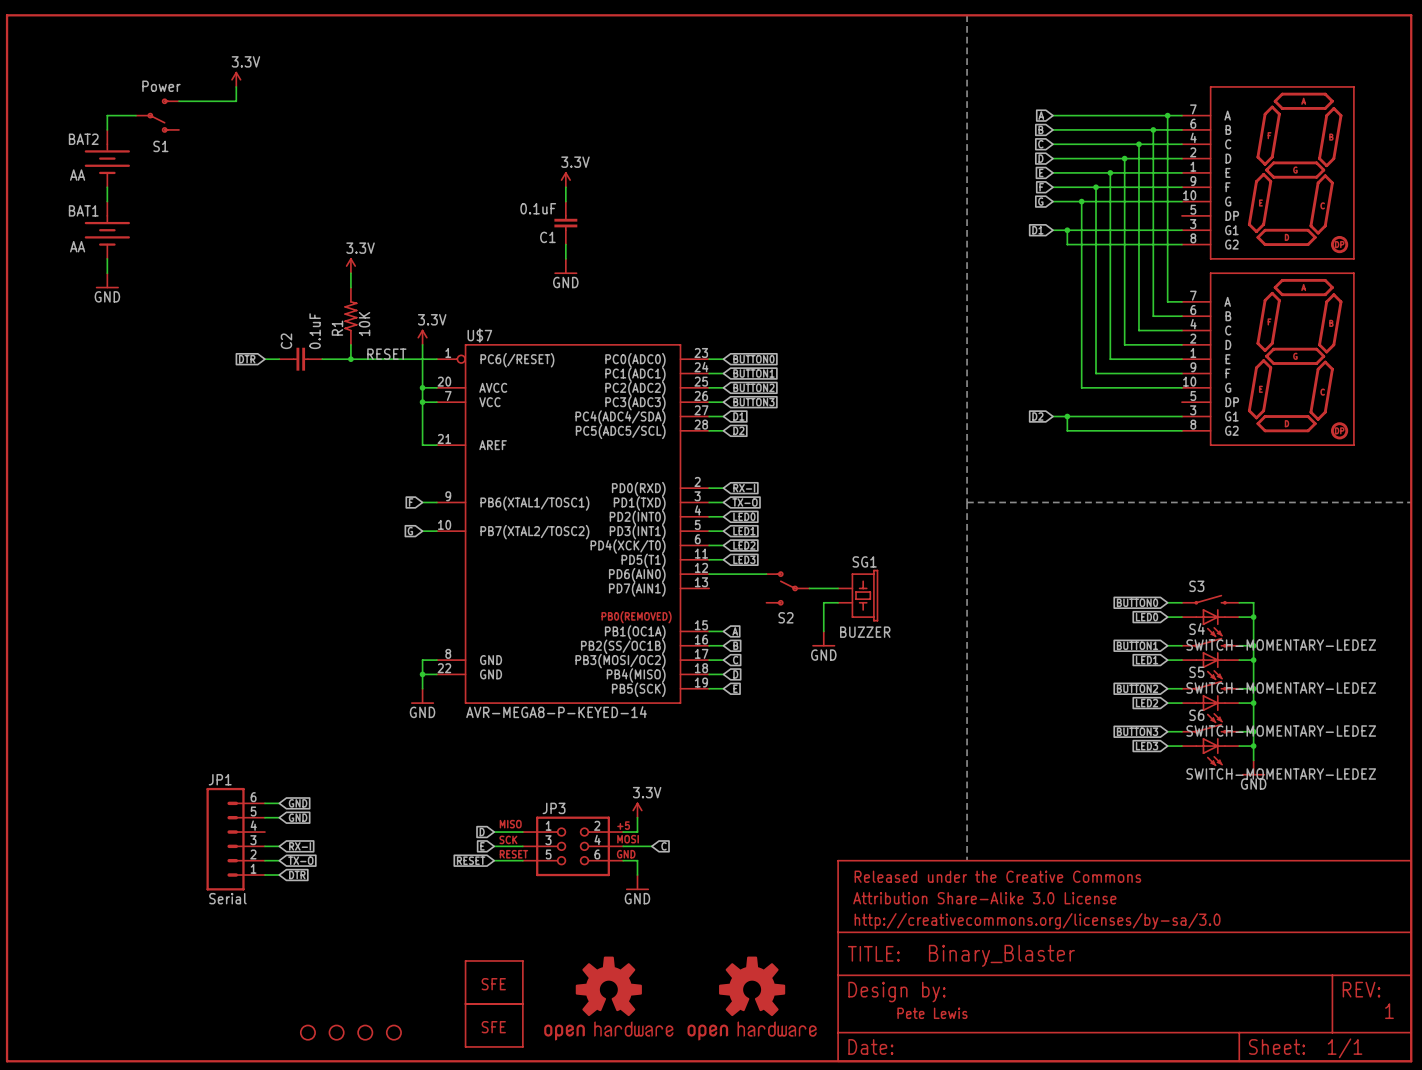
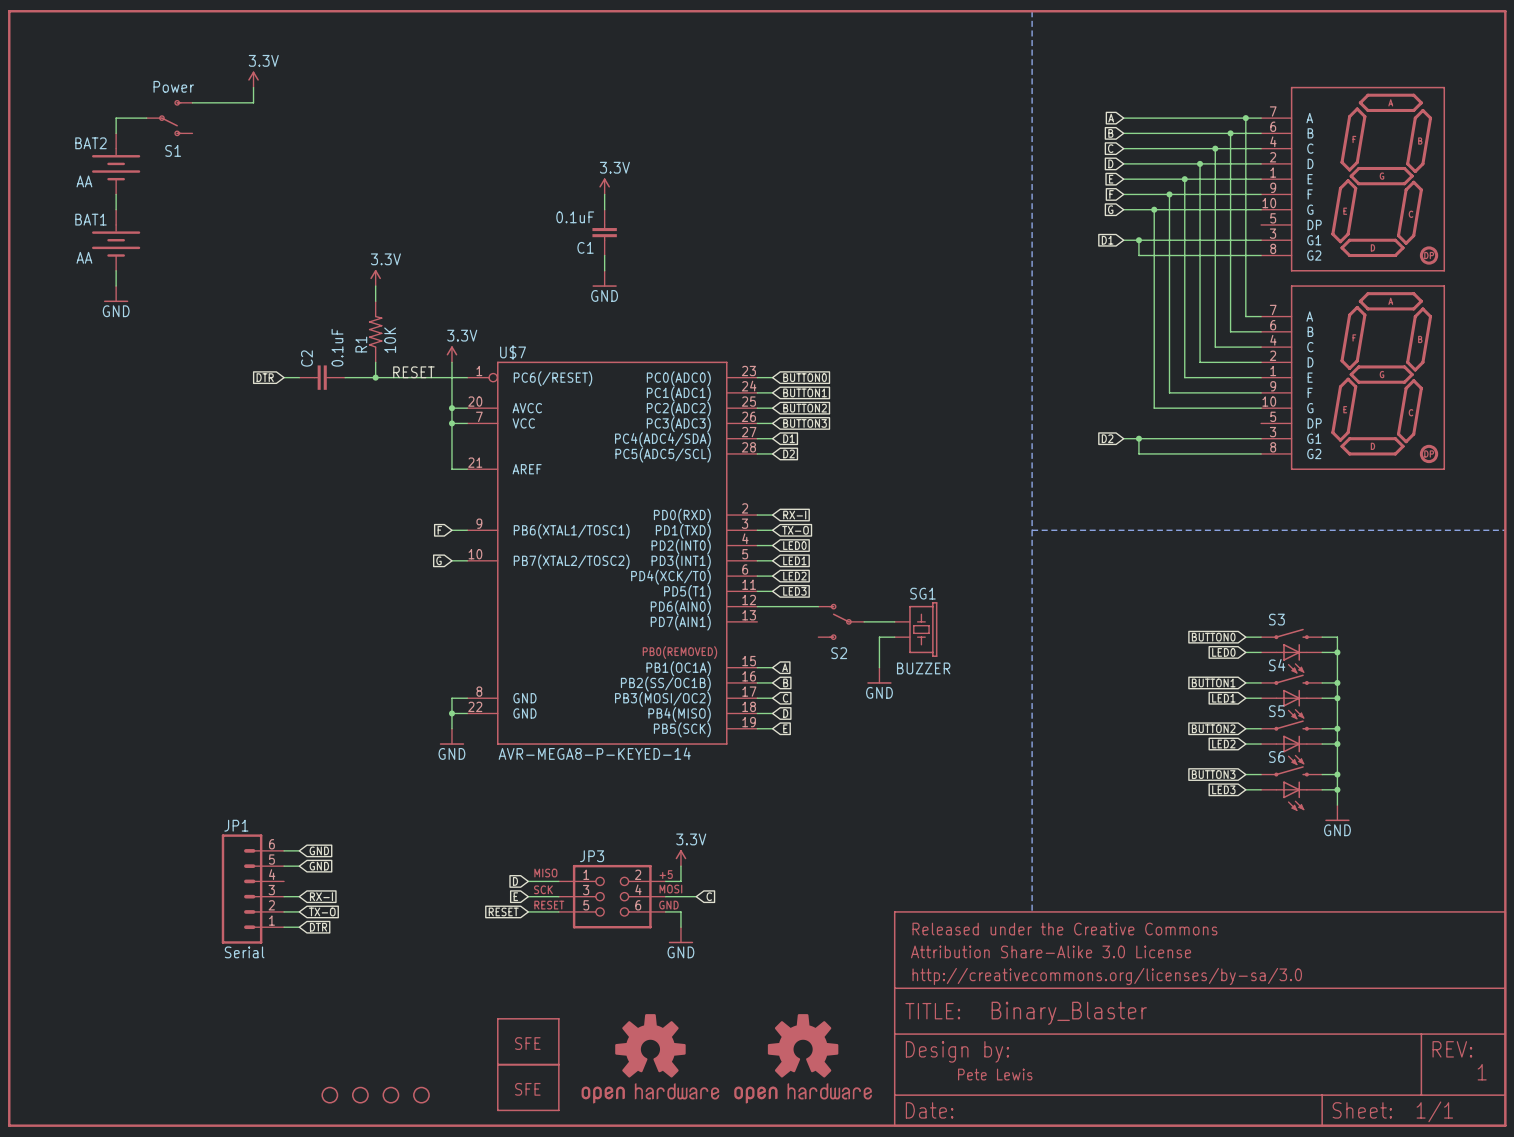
S3 value: SWITCH-MOMENTARY-LEDEZ (1281, 645) -> none
S4 value: SWITCH-MOMENTARY-LEDEZ (1281, 688) -> none
S5 value: SWITCH-MOMENTARY-LEDEZ (1281, 731) -> none
S6 value: SWITCH-MOMENTARY-LEDEZ (1281, 774) -> none

